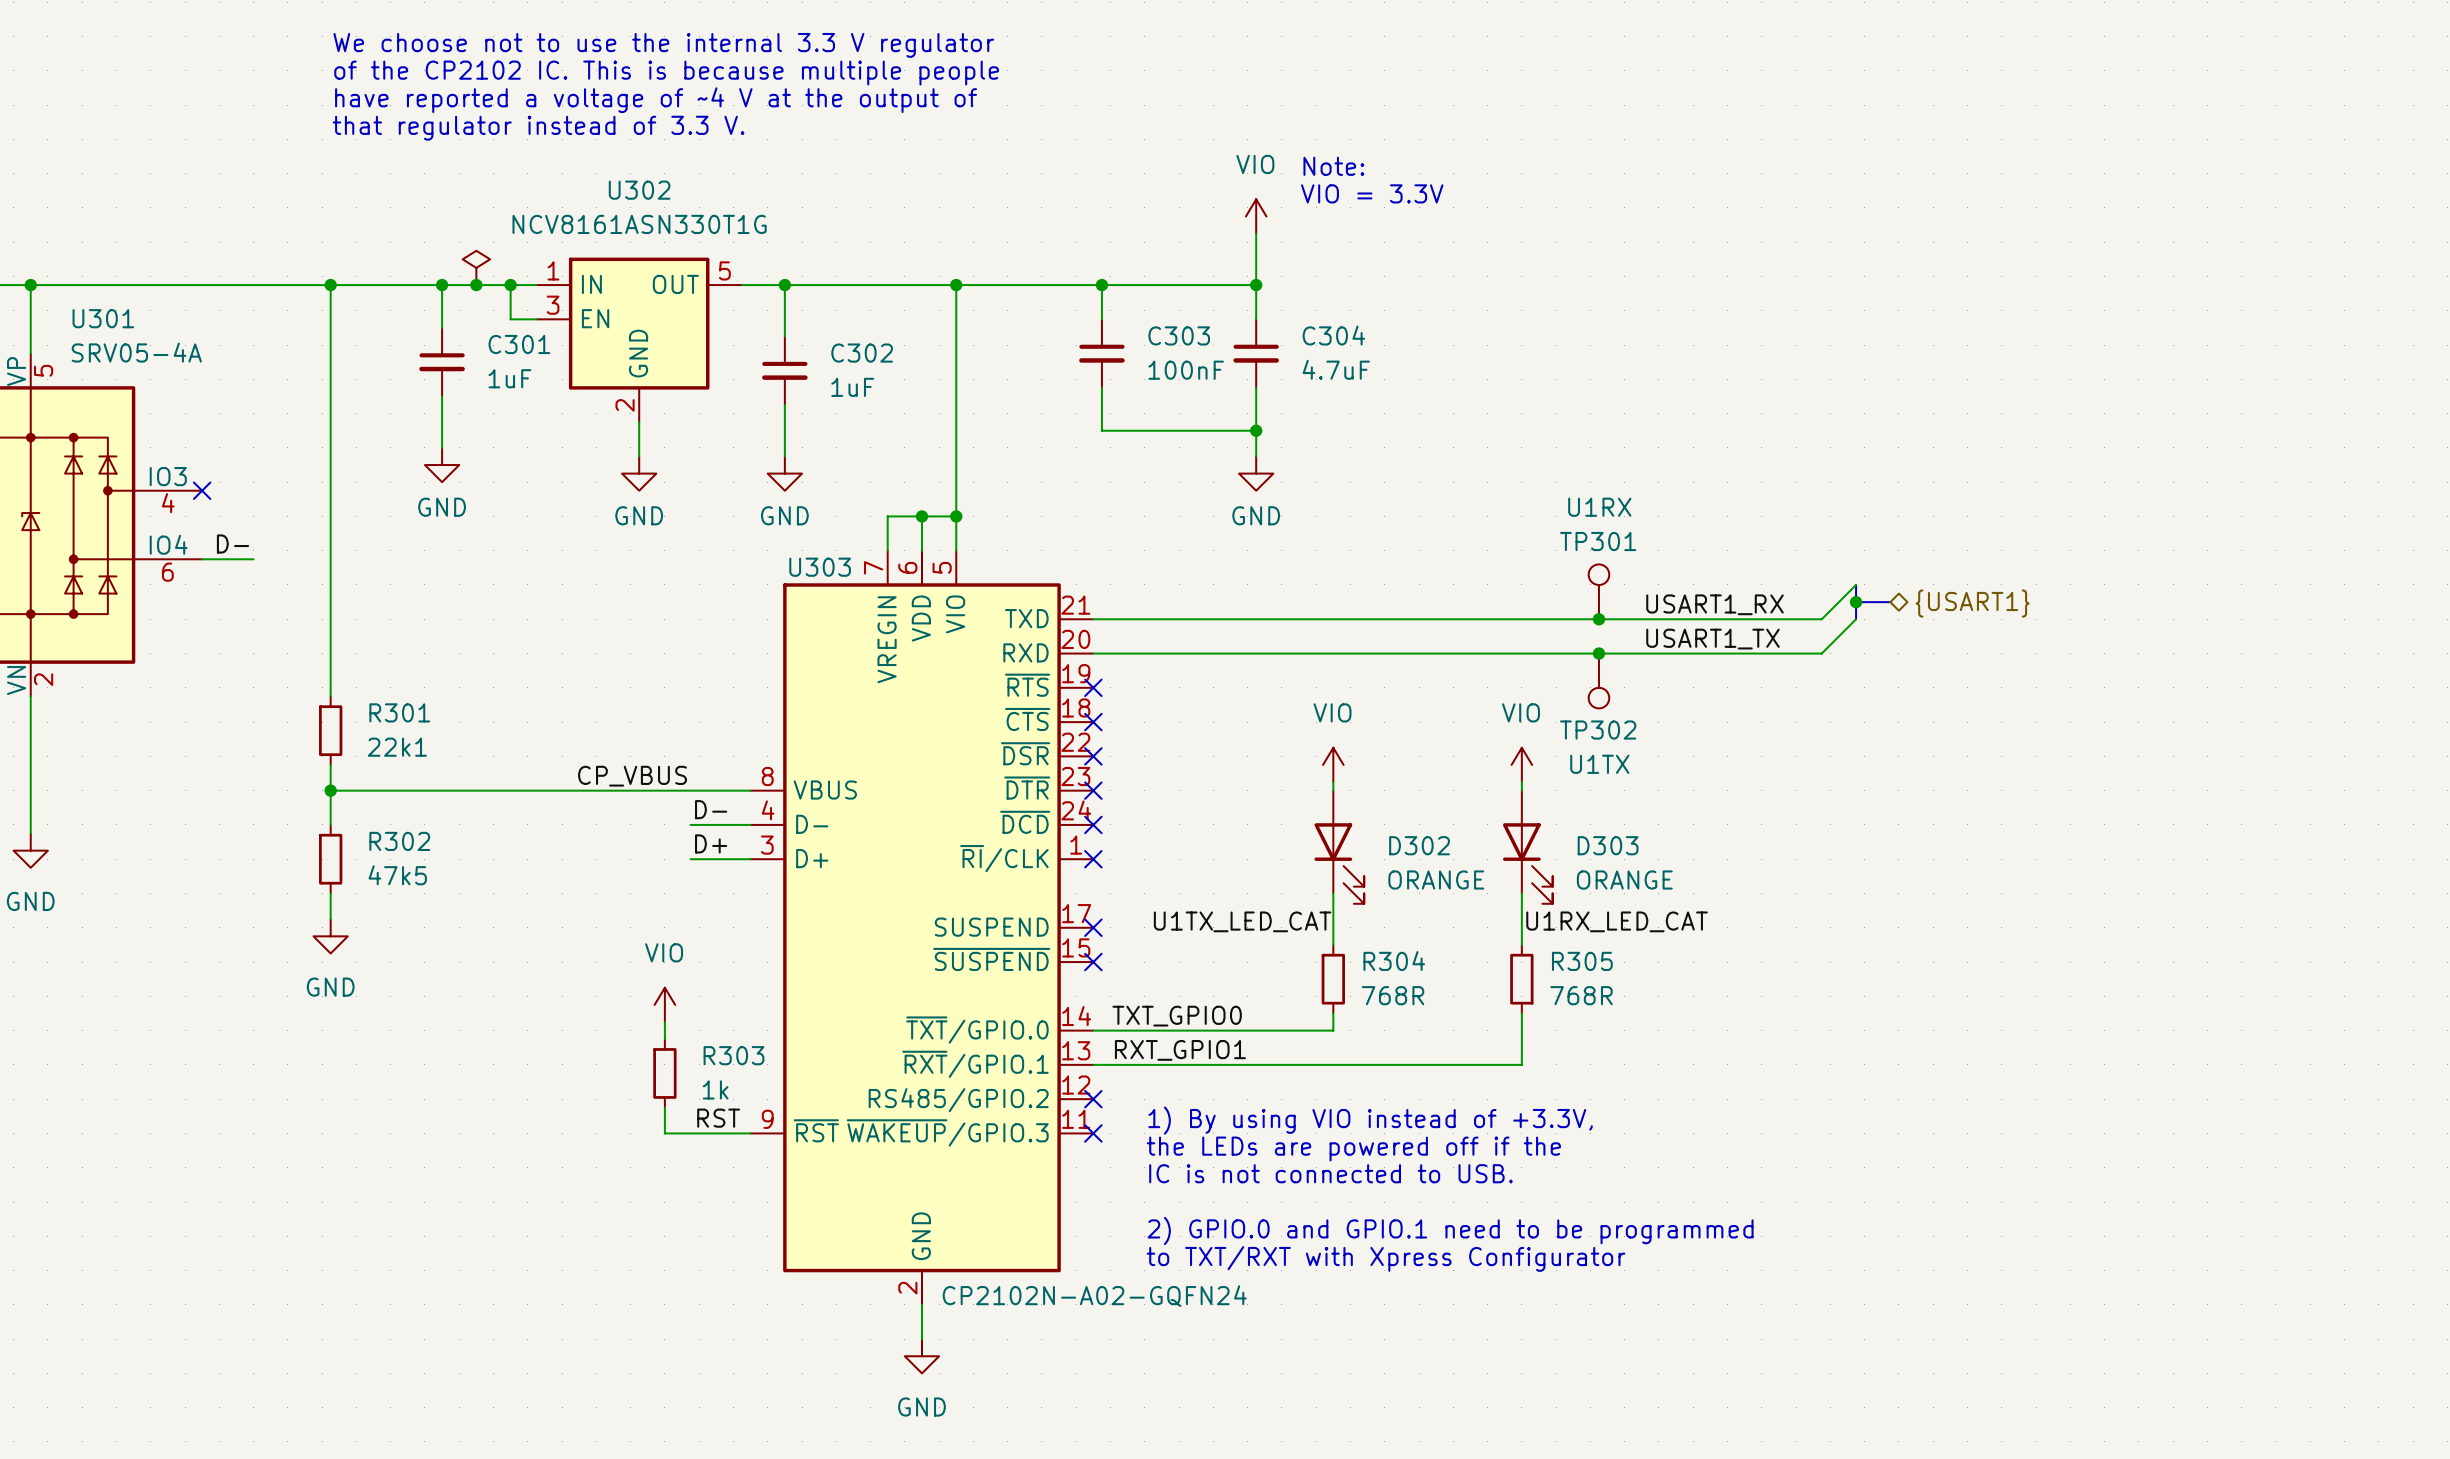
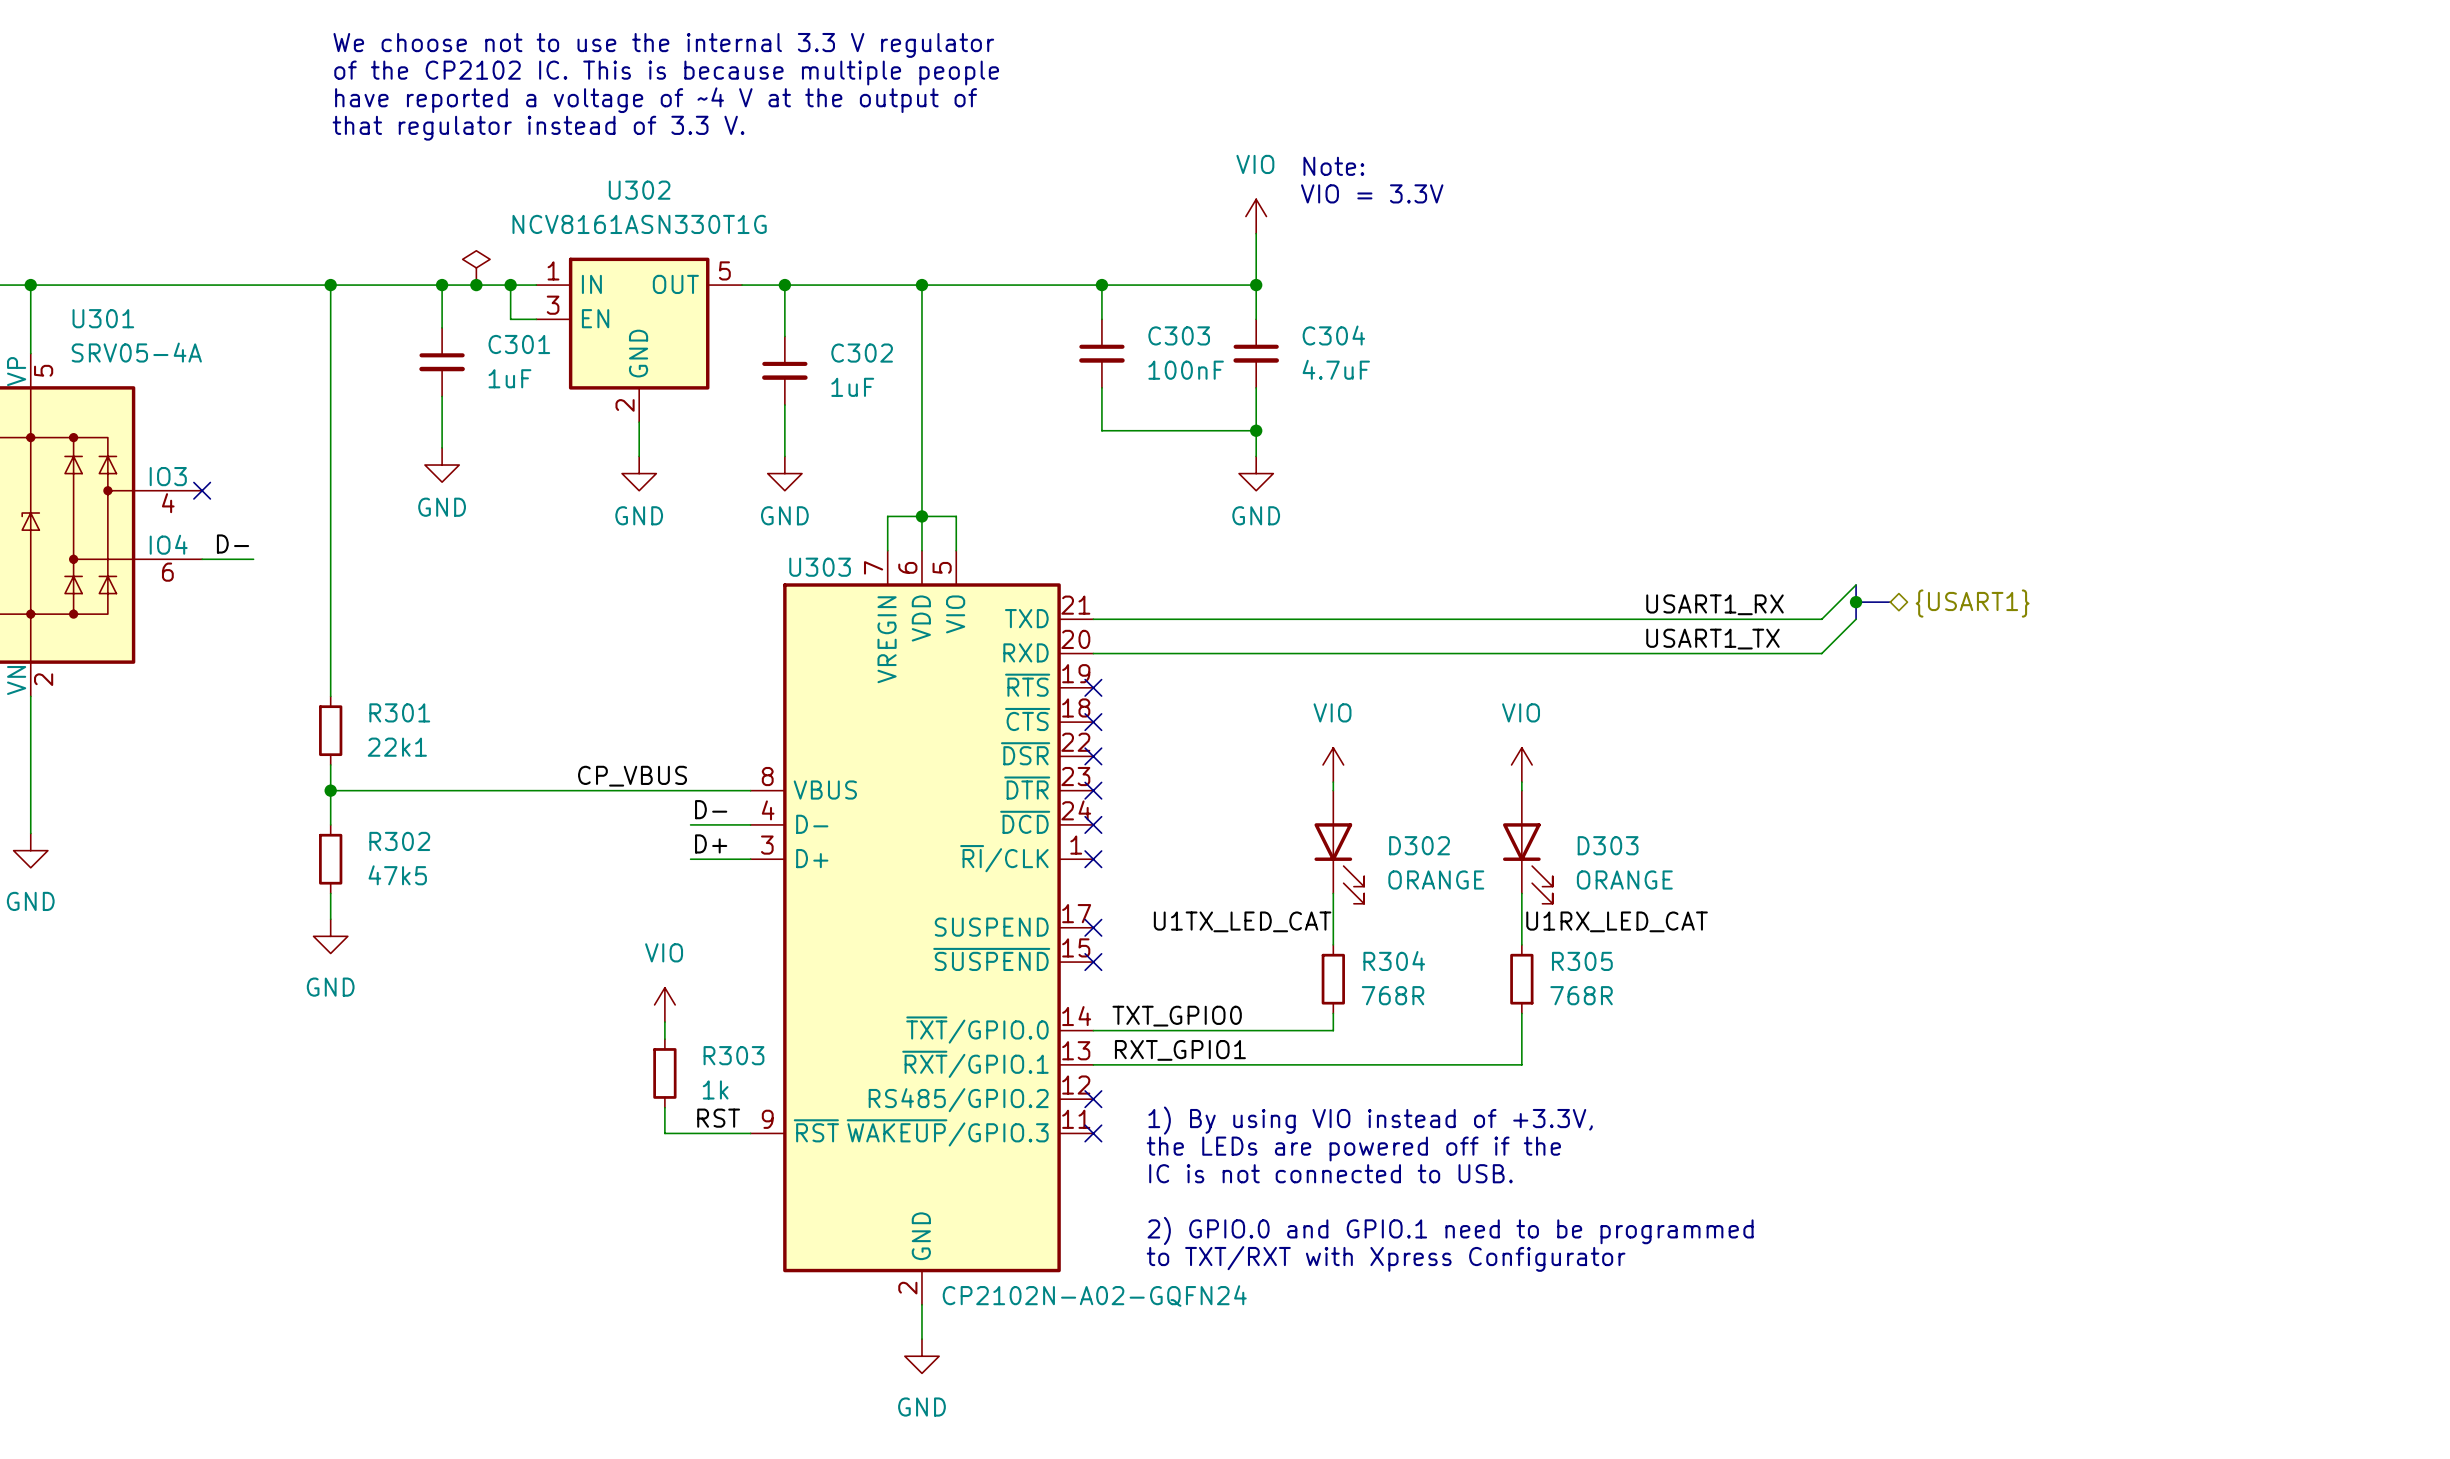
wire: (956, 285) (956, 516) -> (921, 285) (921, 516)
junction position: (956, 285) -> (921, 285)
junction: (956, 516) -> none
TP301: U1RX (1598, 591) -> none
junction: (1598, 619) -> none
junction: (1598, 653) -> none
TP302: U1TX (1598, 680) -> none

